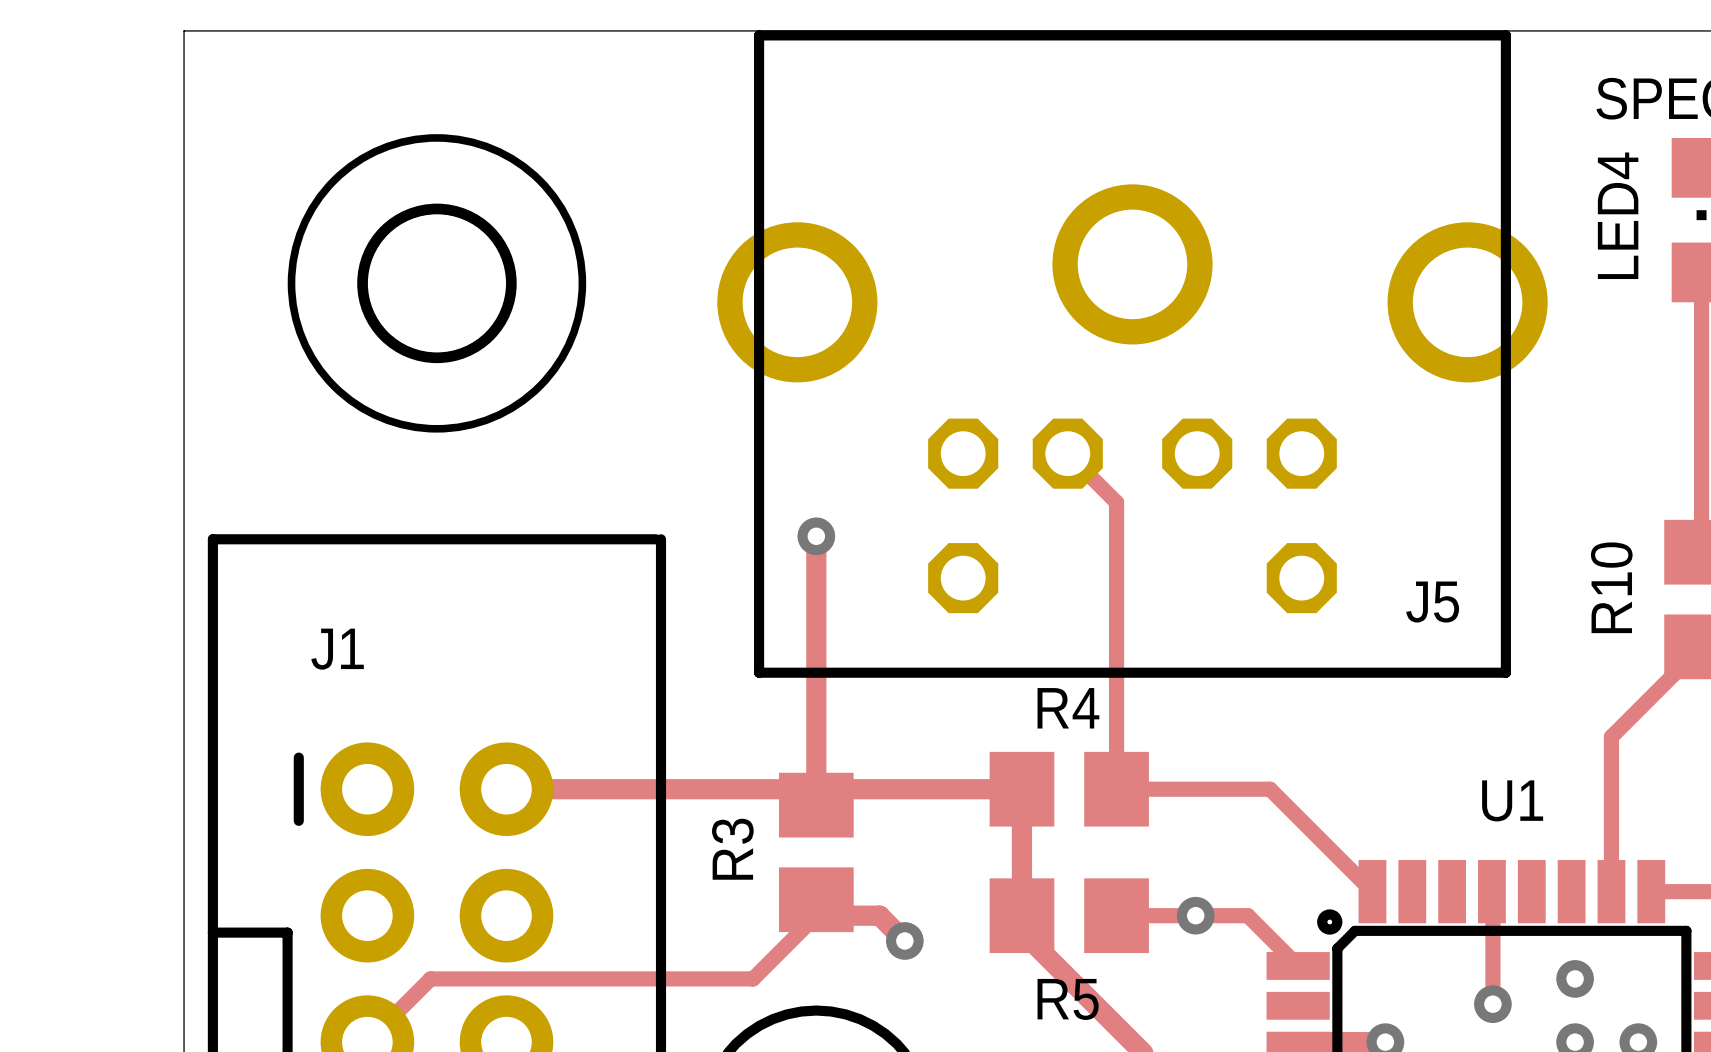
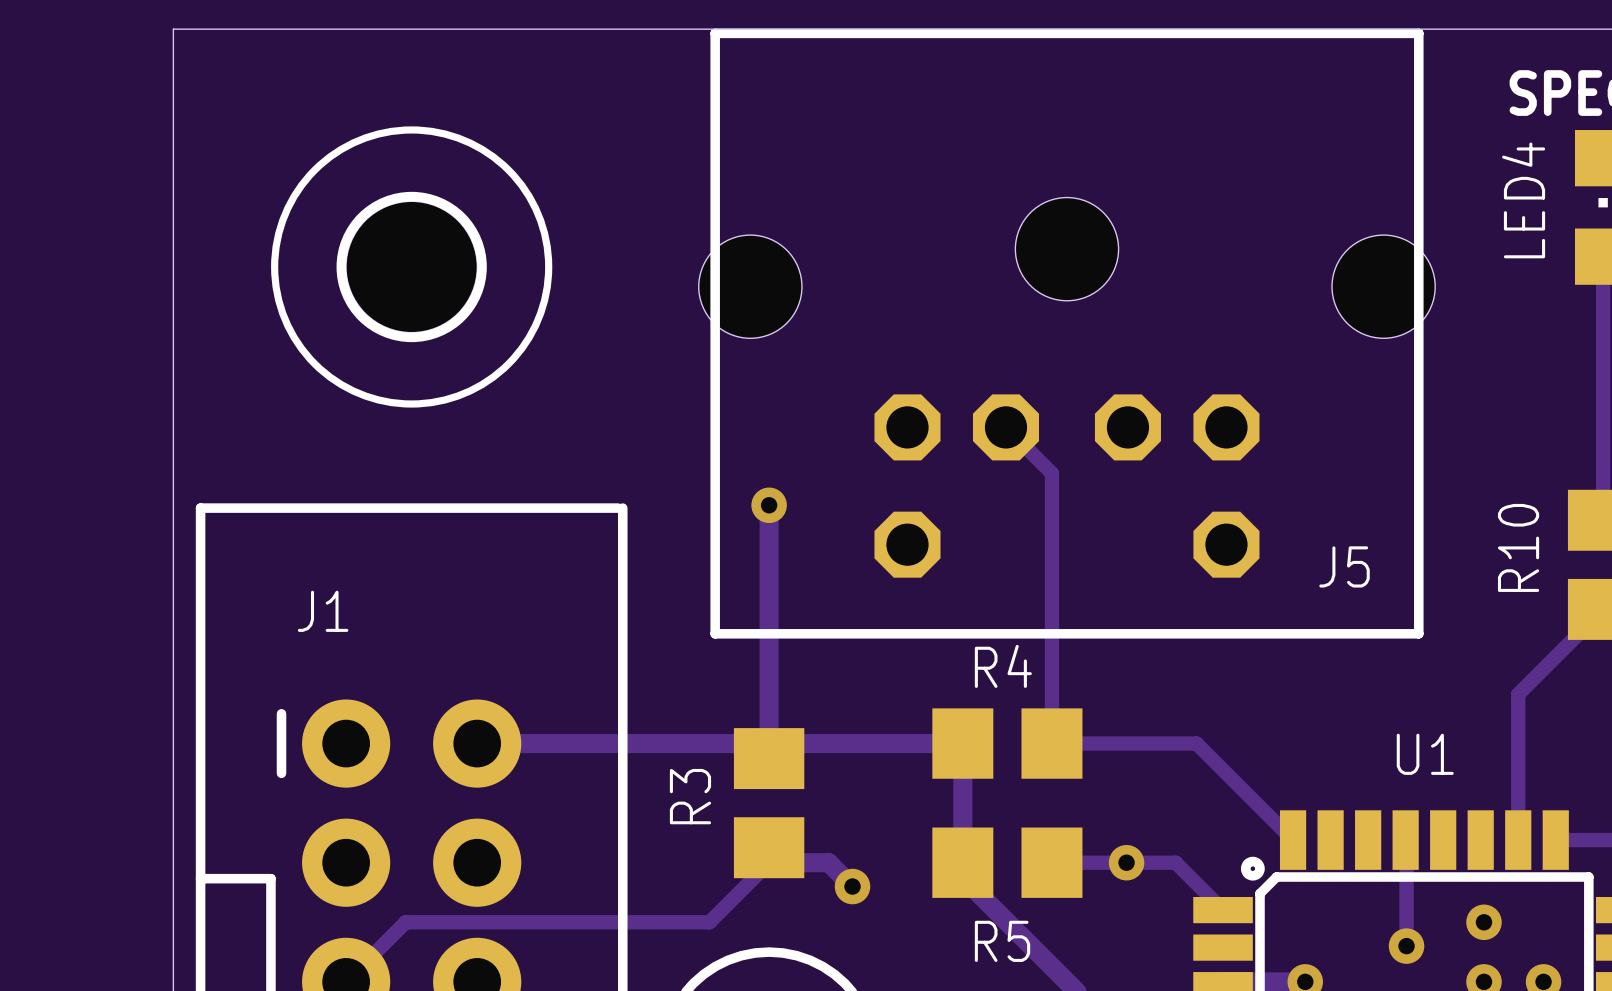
J5 footprint: [717, 30, 1548, 678] -> [698, 28, 1436, 639]

